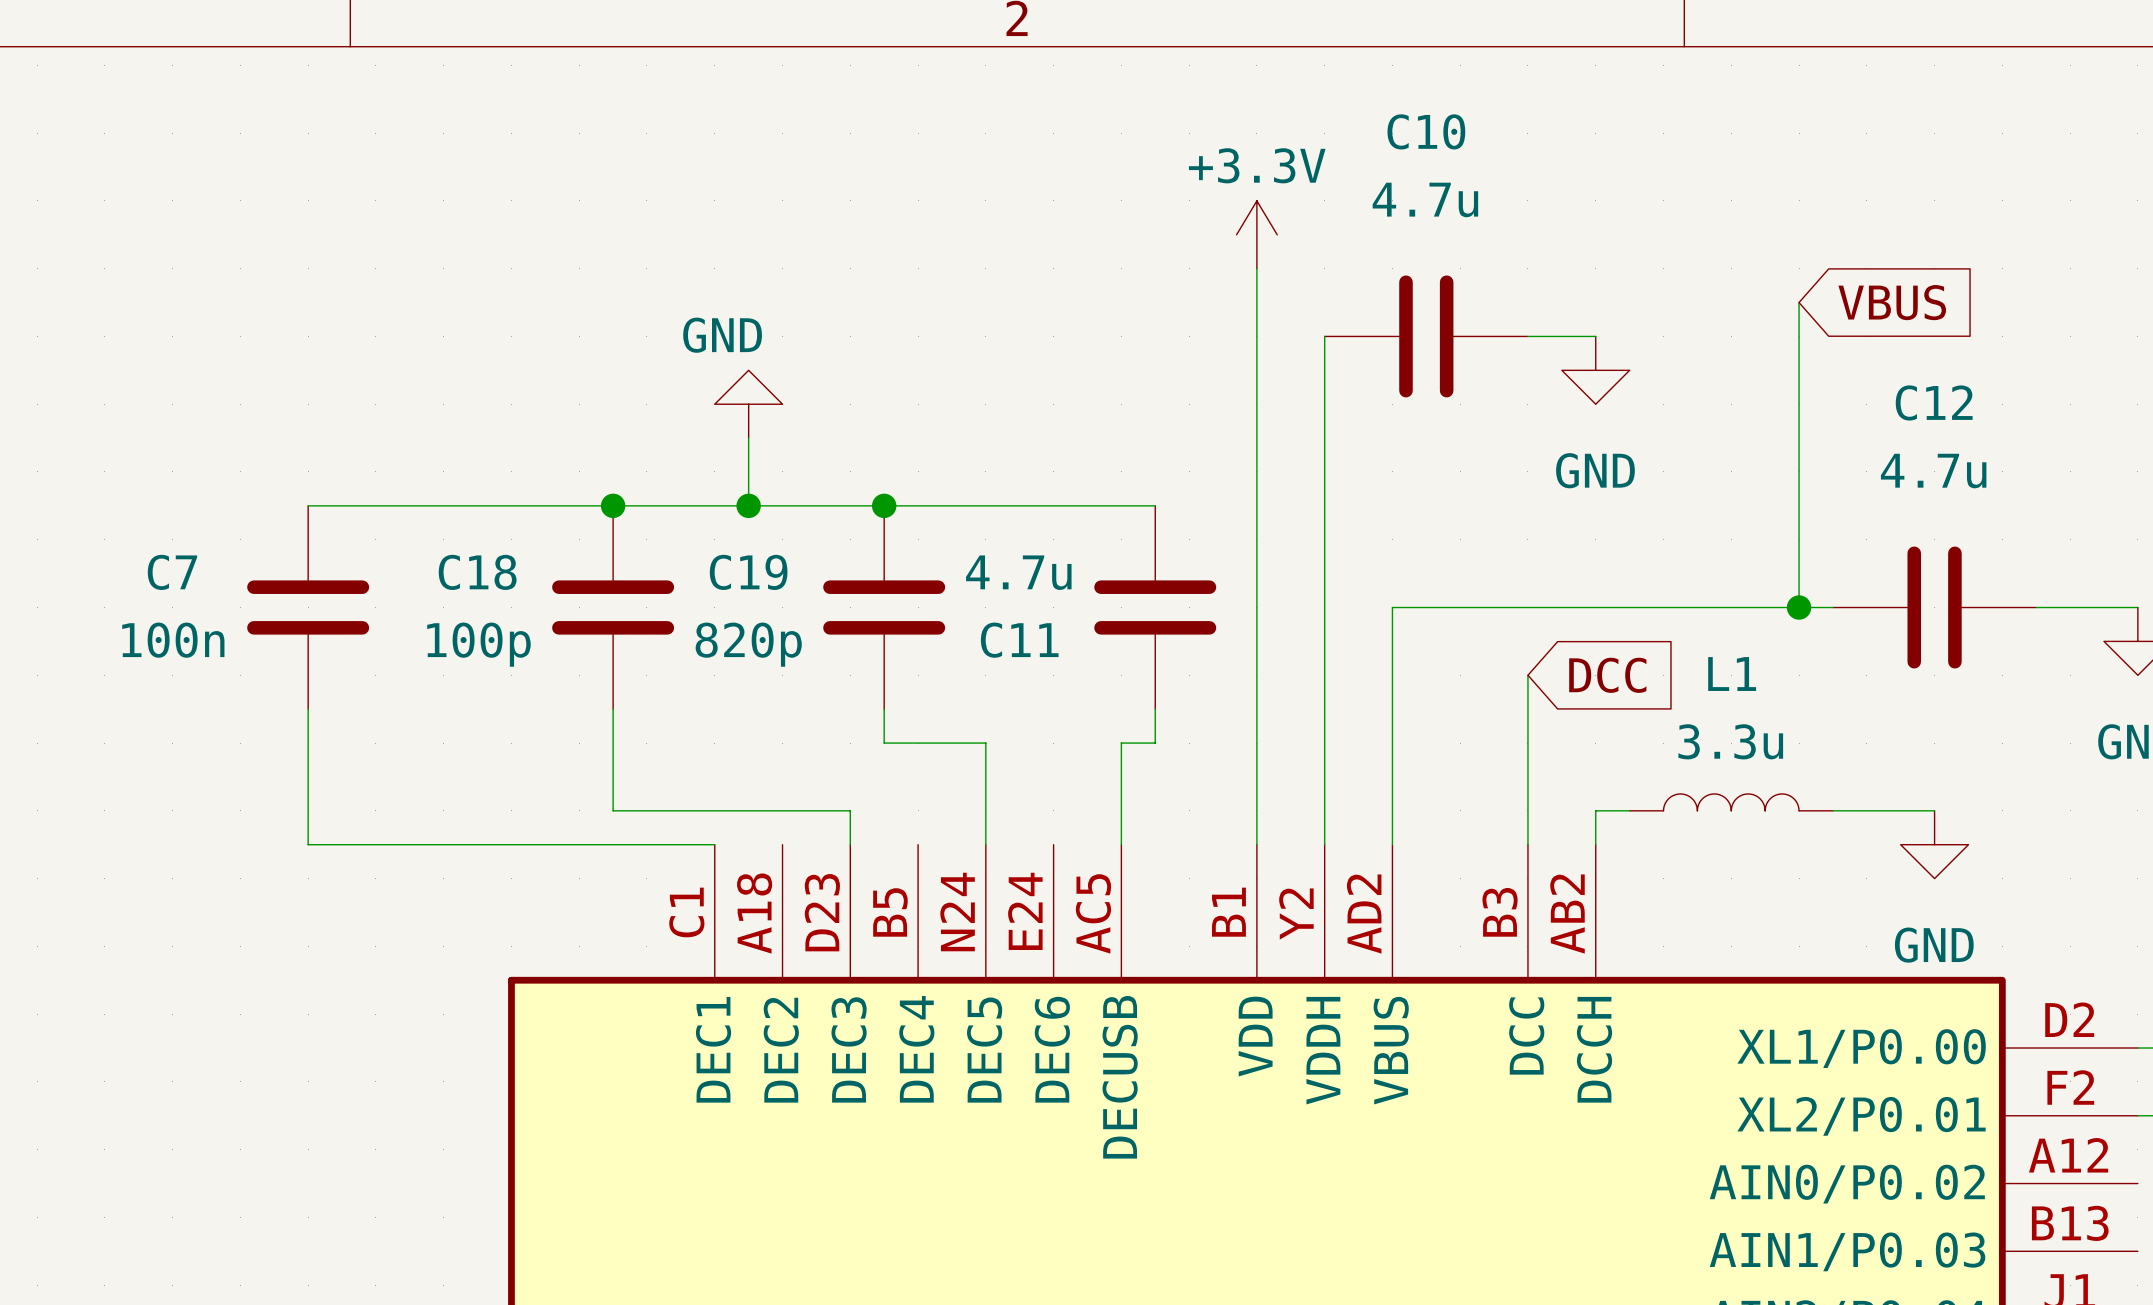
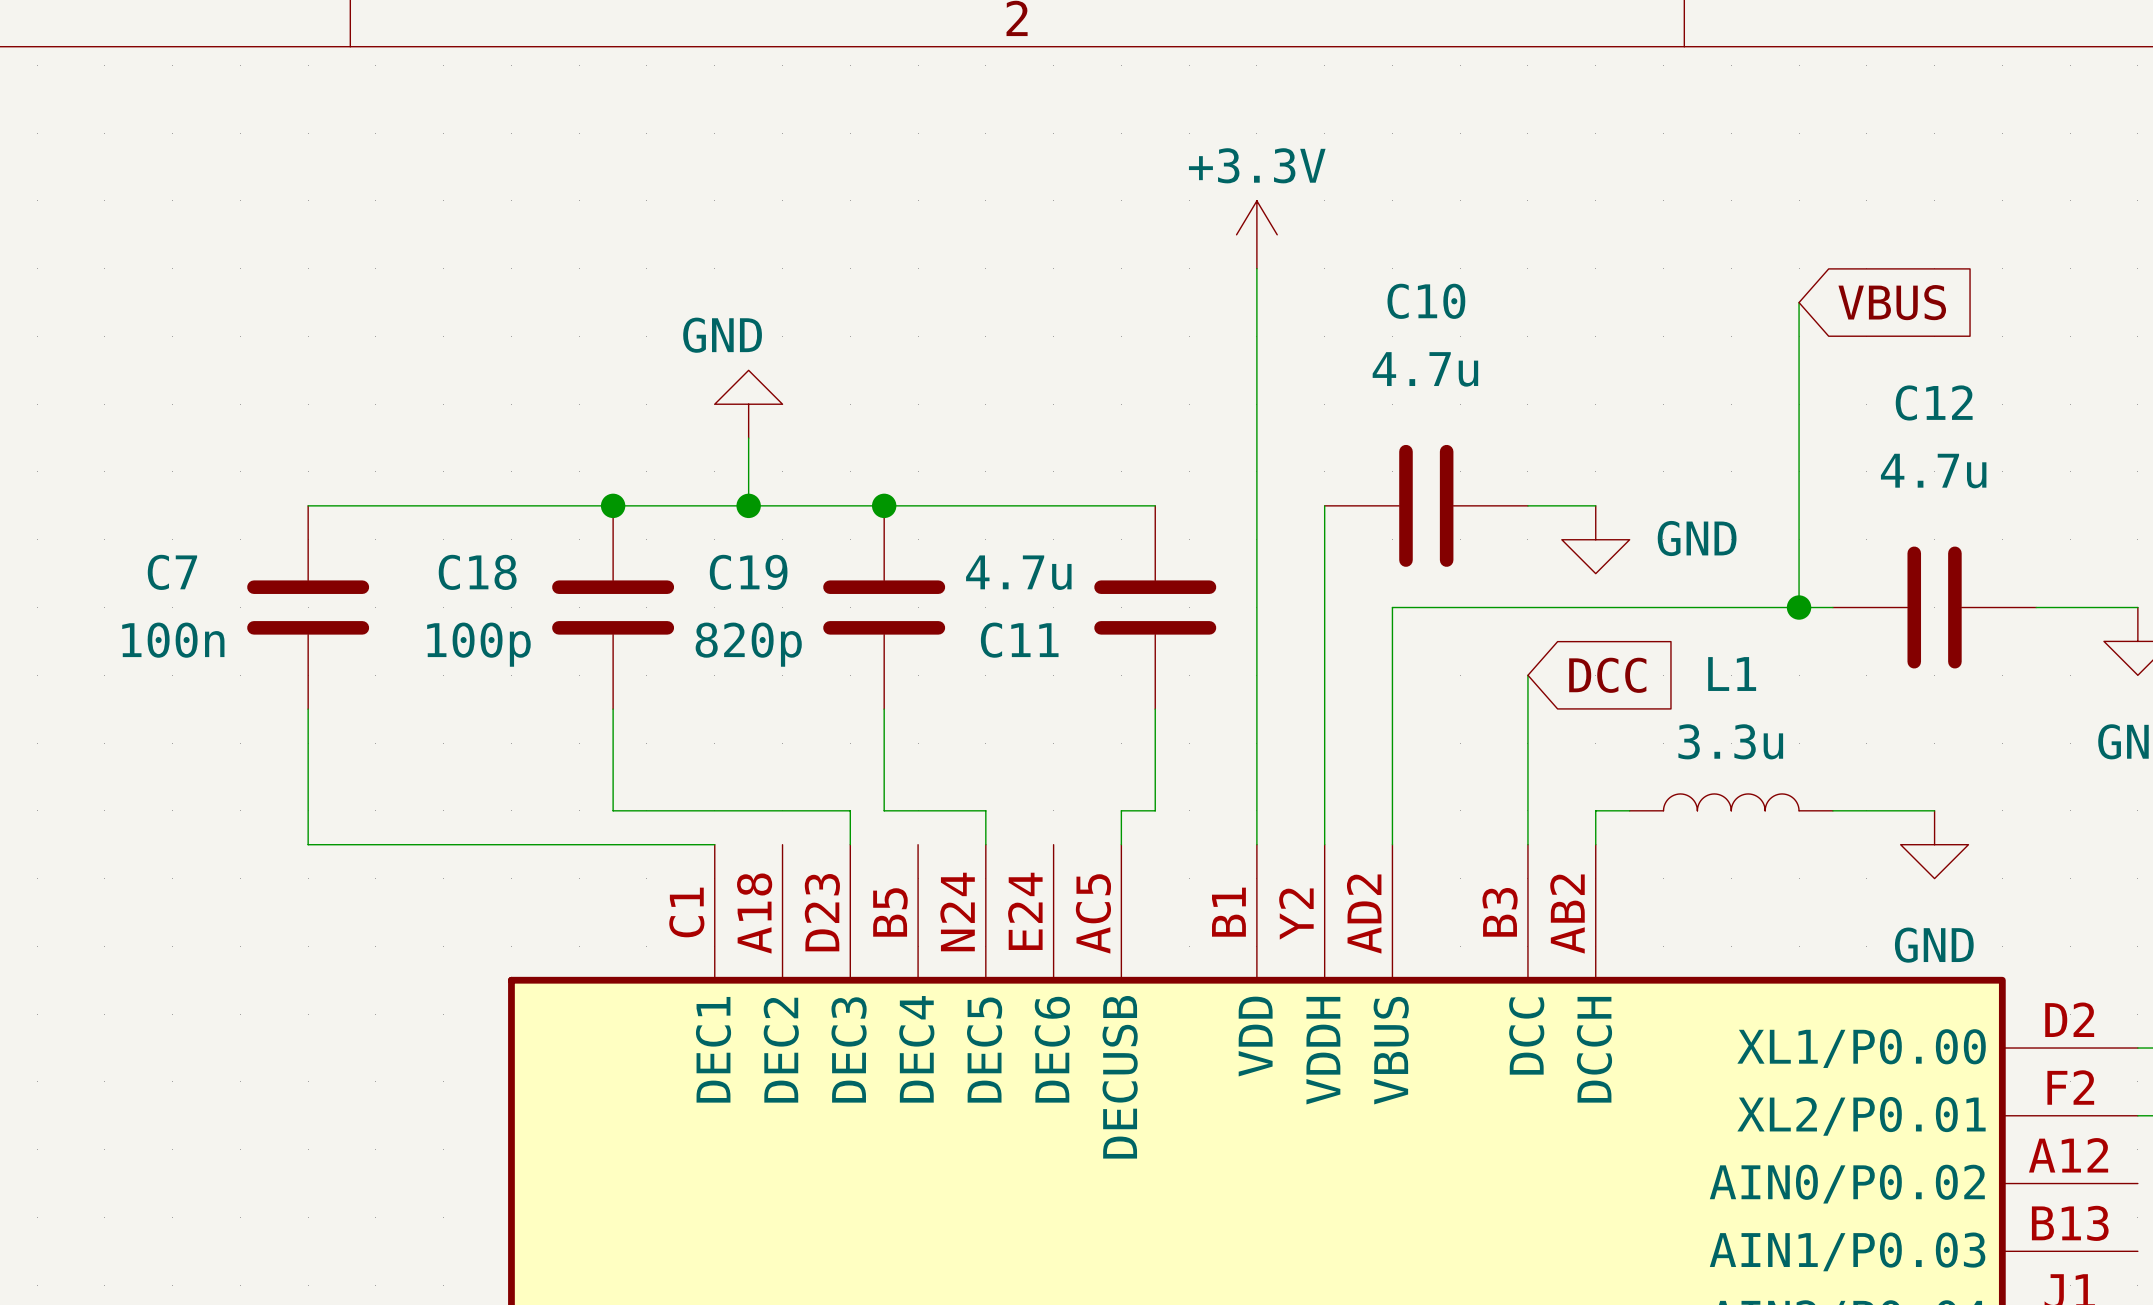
wire: (1324, 336) (1324, 505) -> none
C10 position: (1426, 336) -> (1426, 505)
wire: (1527, 336) (1595, 336) -> (1527, 505) (1595, 505)
power symbol position: GND (1595, 370) -> GND (1595, 539)
power symbol text position: GND (1595, 470) -> GND (1697, 538)
wire: (884, 743) (985, 743) (985, 810) -> (884, 743) (884, 810) (985, 810)
wire: (1155, 743) (1121, 743) (1121, 810) -> (1155, 743) (1155, 810) (1121, 810)

